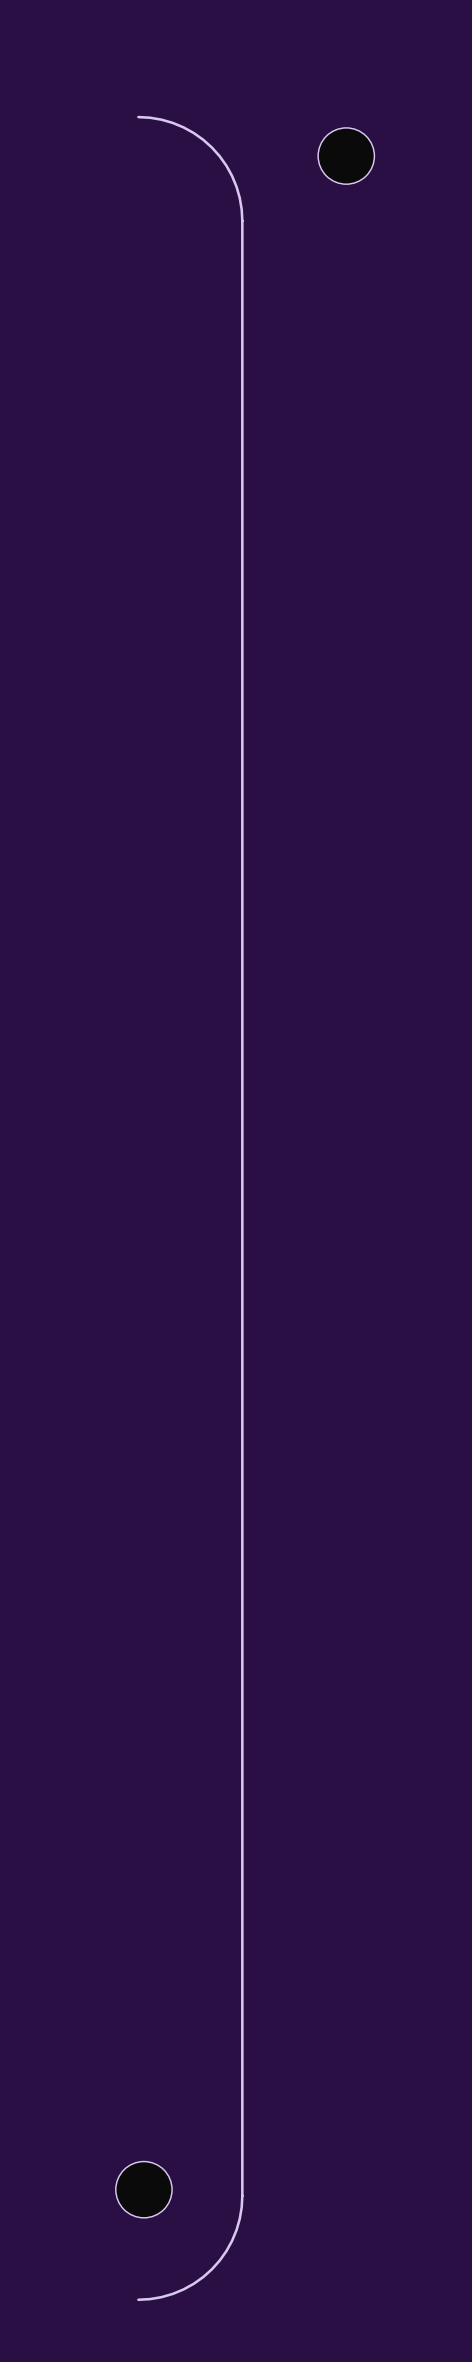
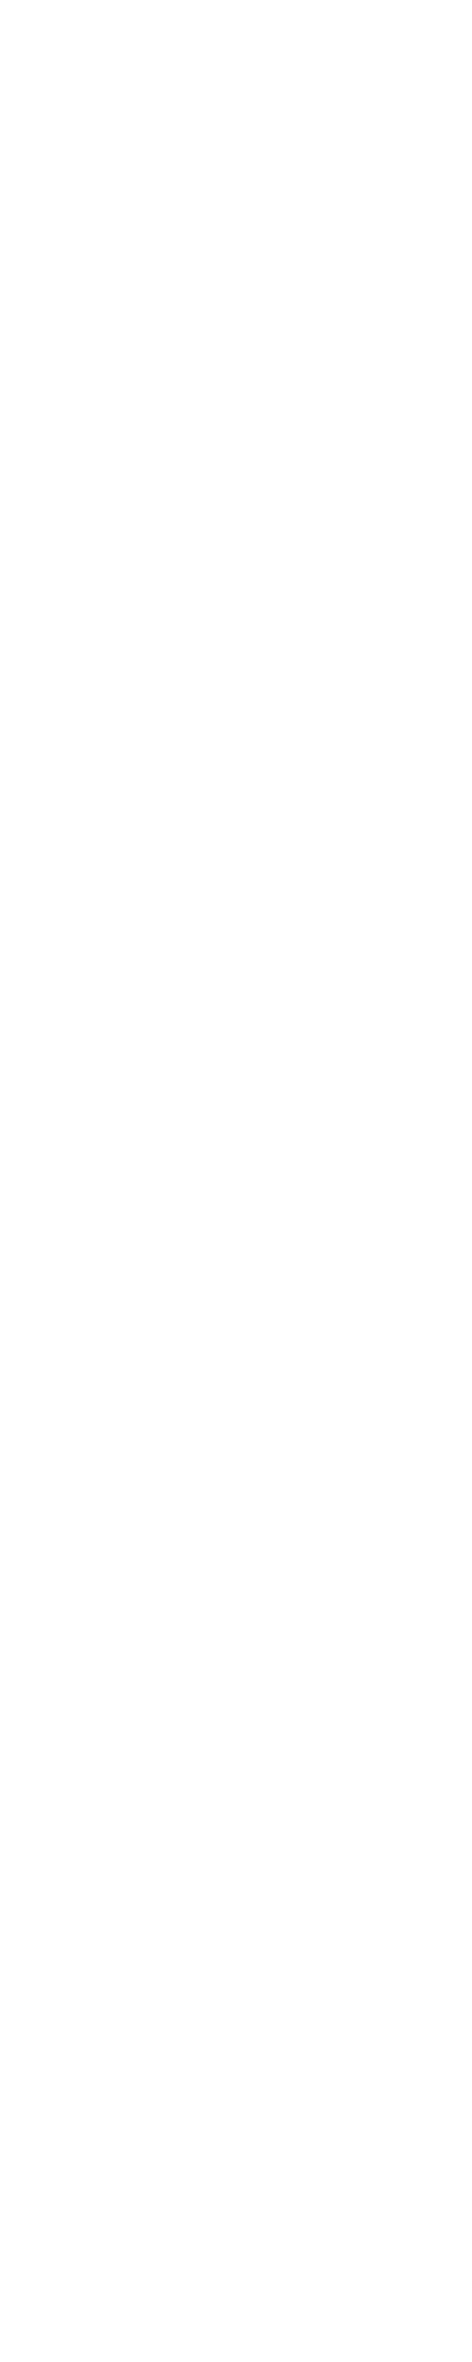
board edge: (138, 117) (161, 119) (183, 127) (211, 147) (232, 175) (239, 197) (242, 221) (242, 2195) (239, 2218) (232, 2240) (211, 2269) (183, 2289) (161, 2297) (138, 2299) -> none
part: (346, 156) -> none
part: (143, 2189) -> none

